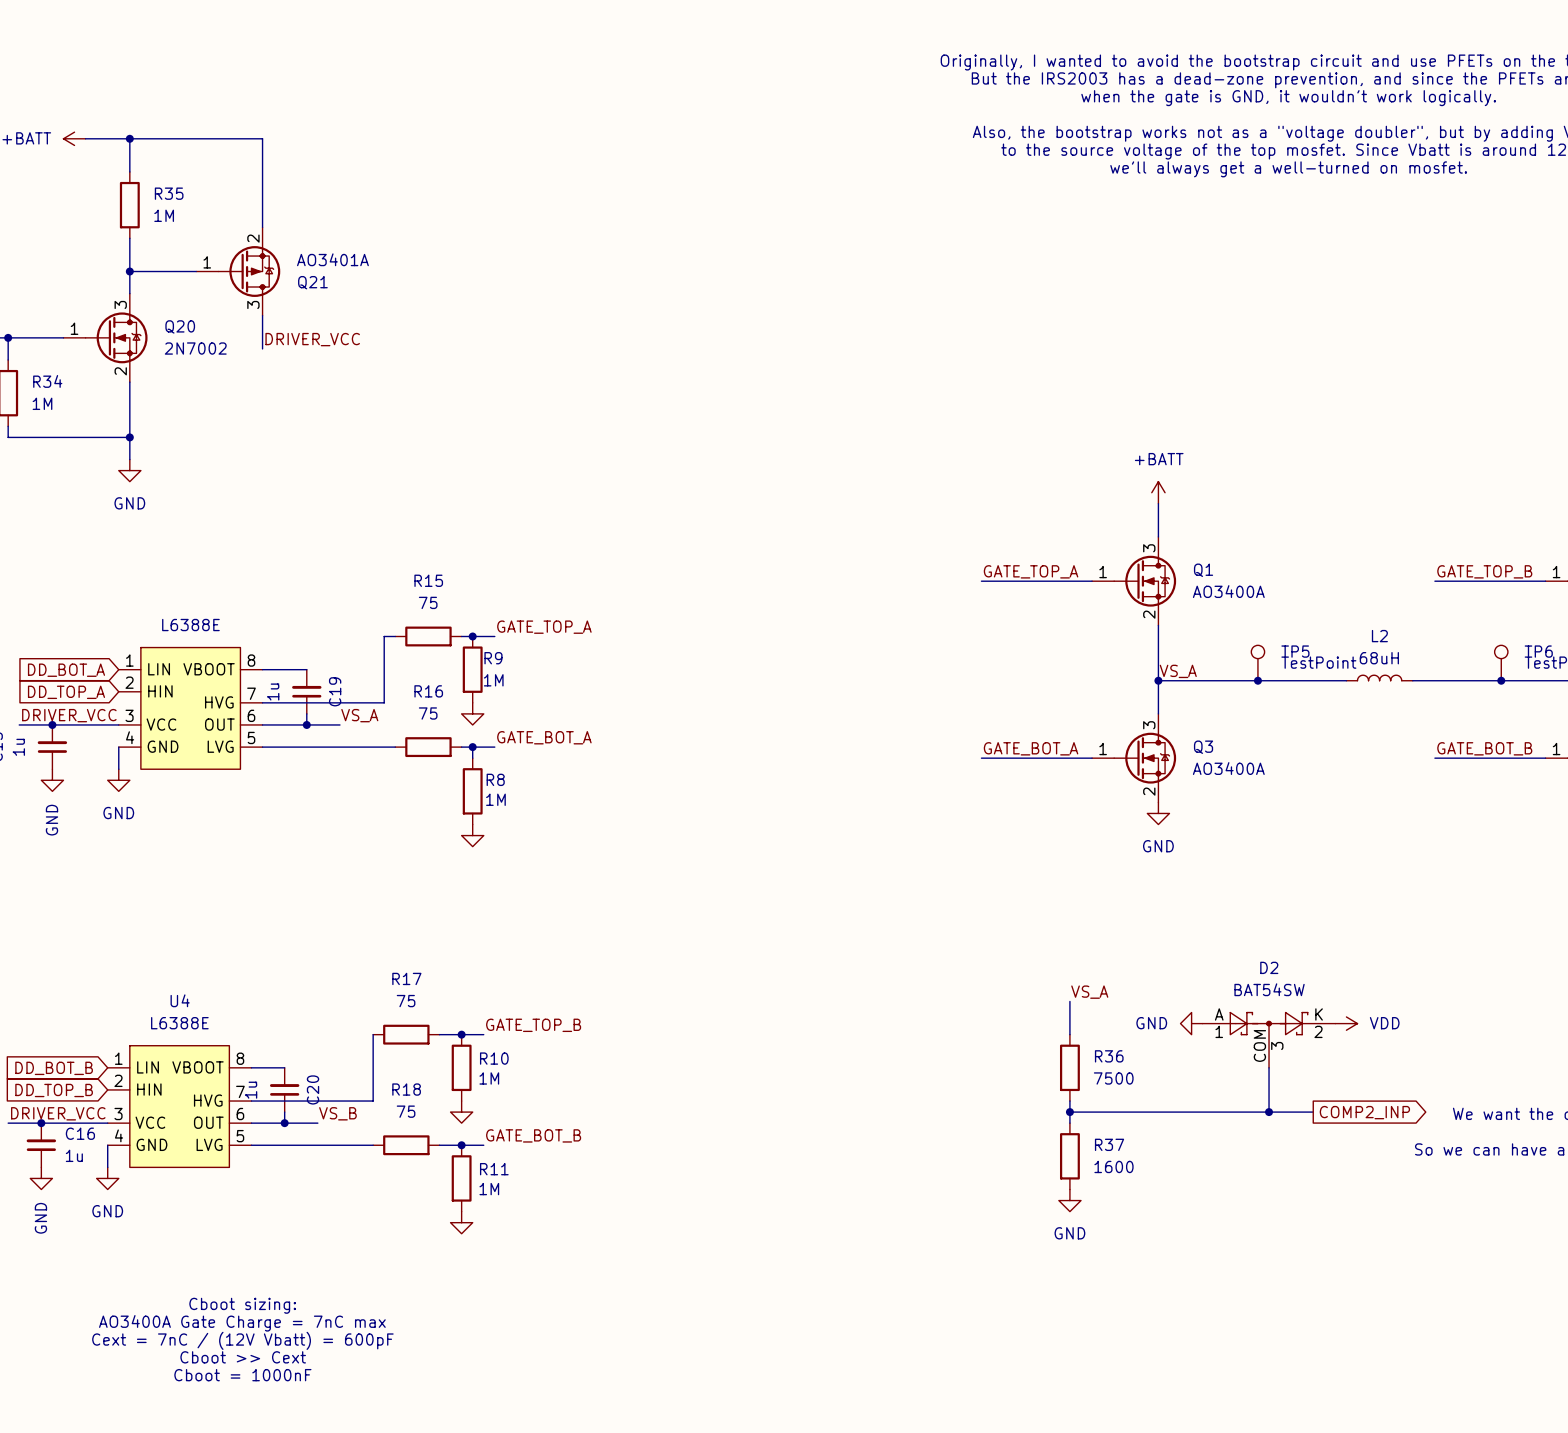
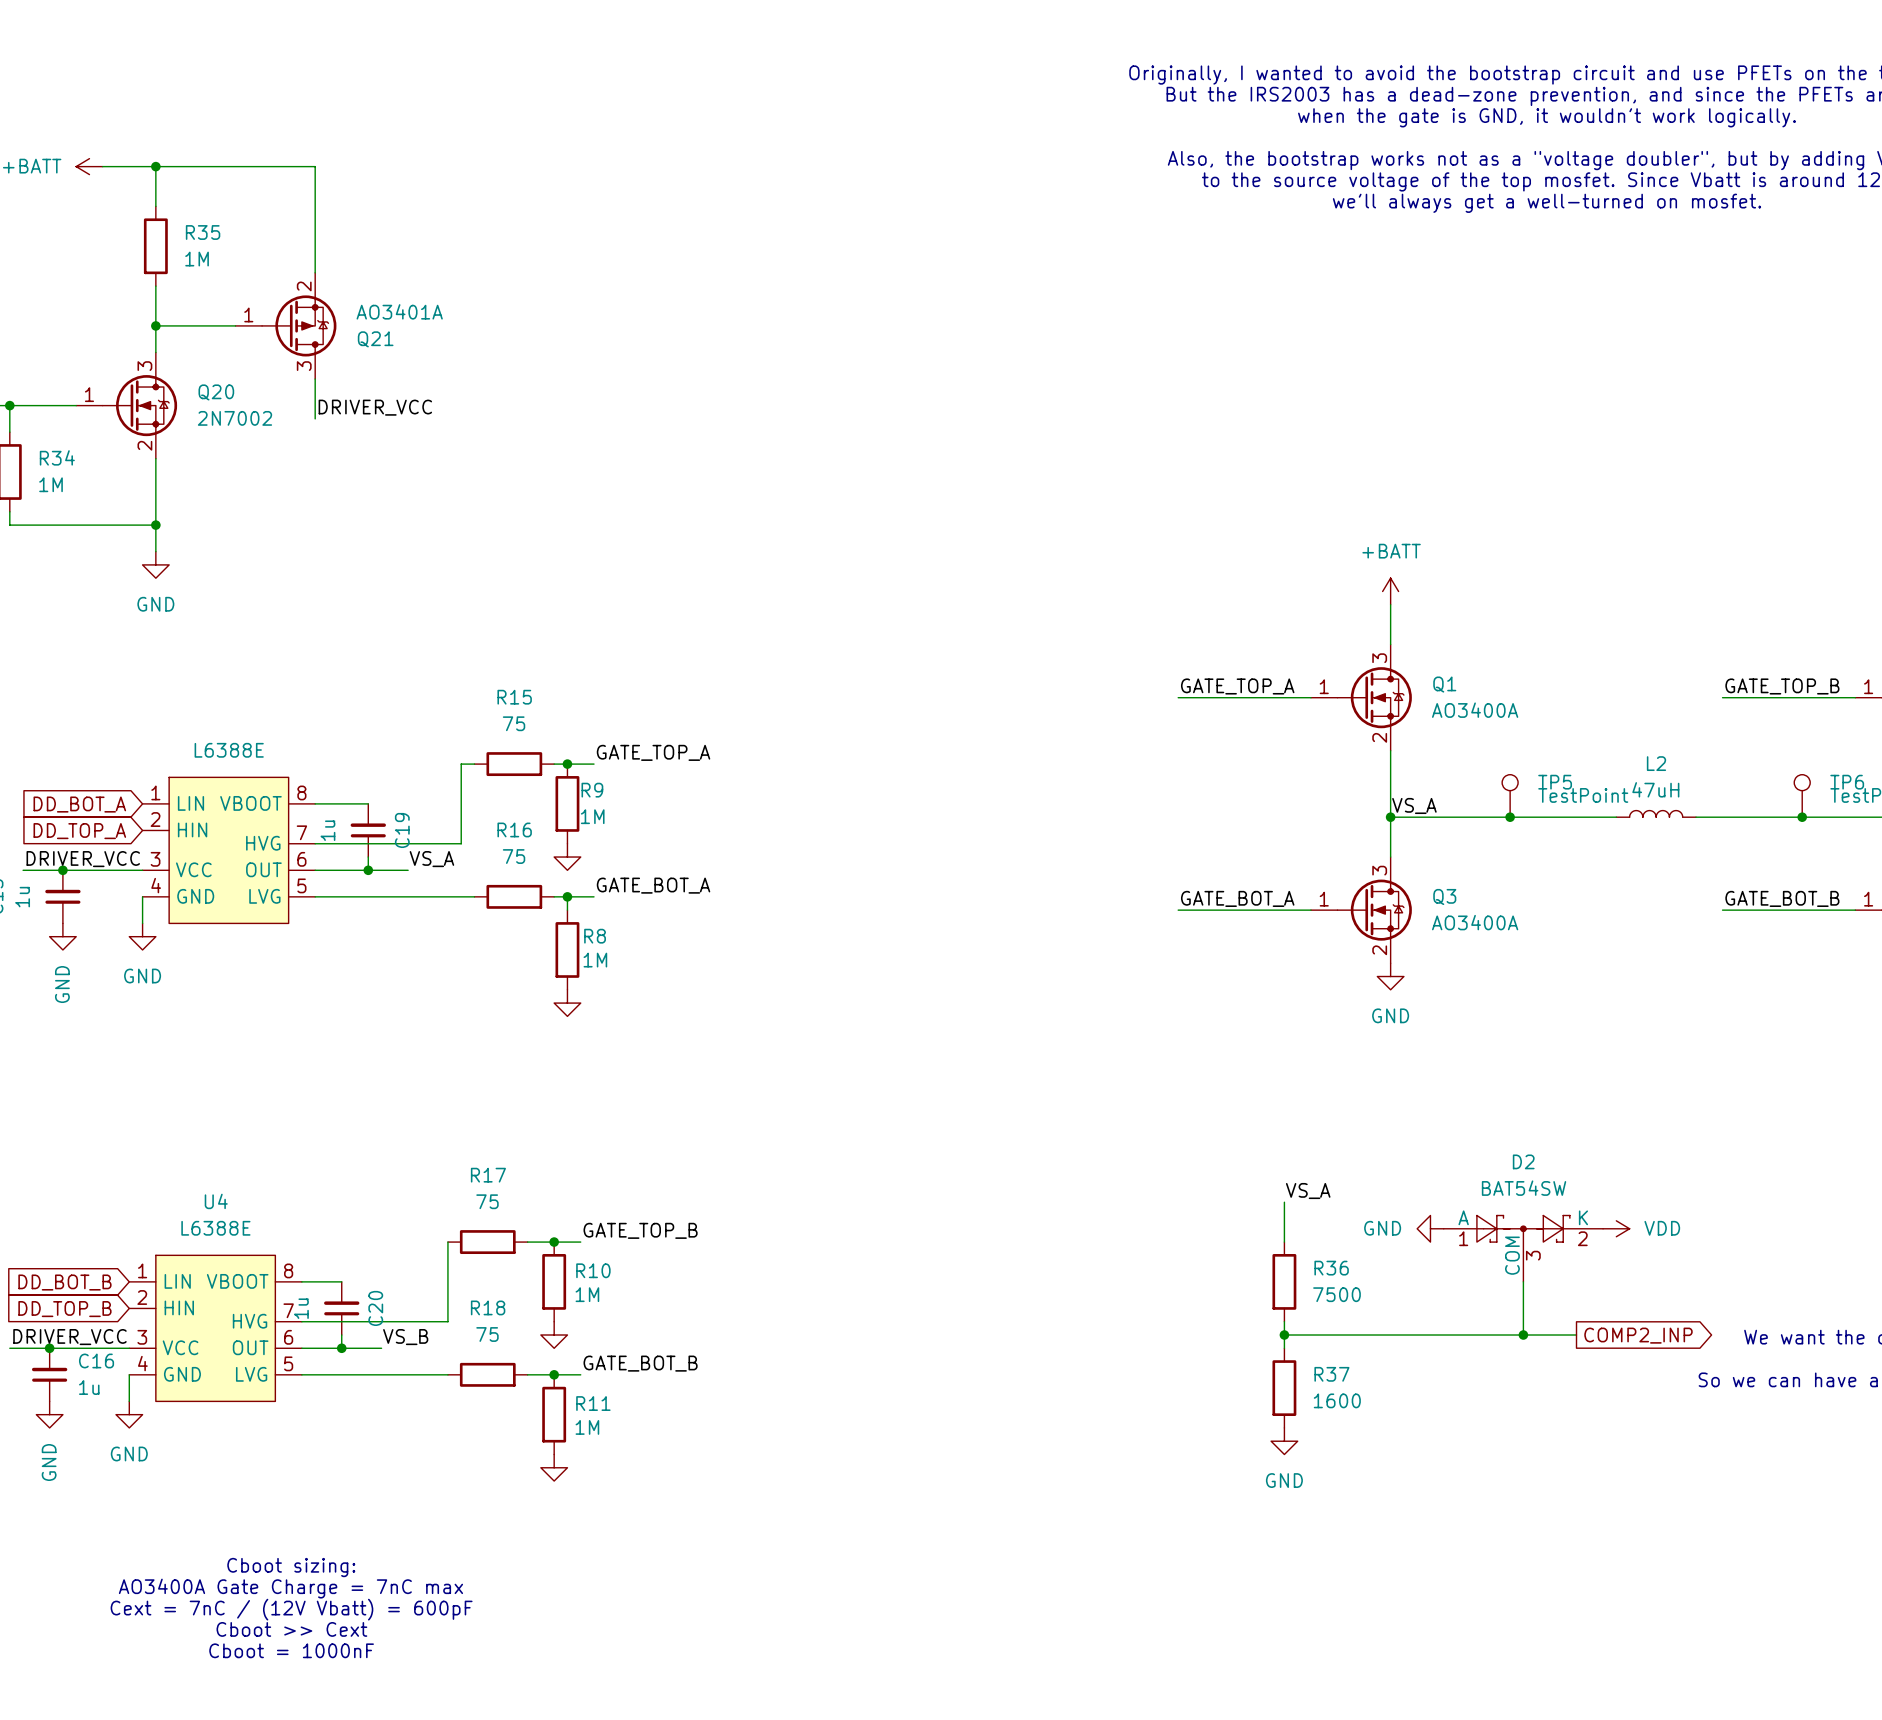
L2 value: 68uH (1379, 658) -> 47uH (1655, 789)

